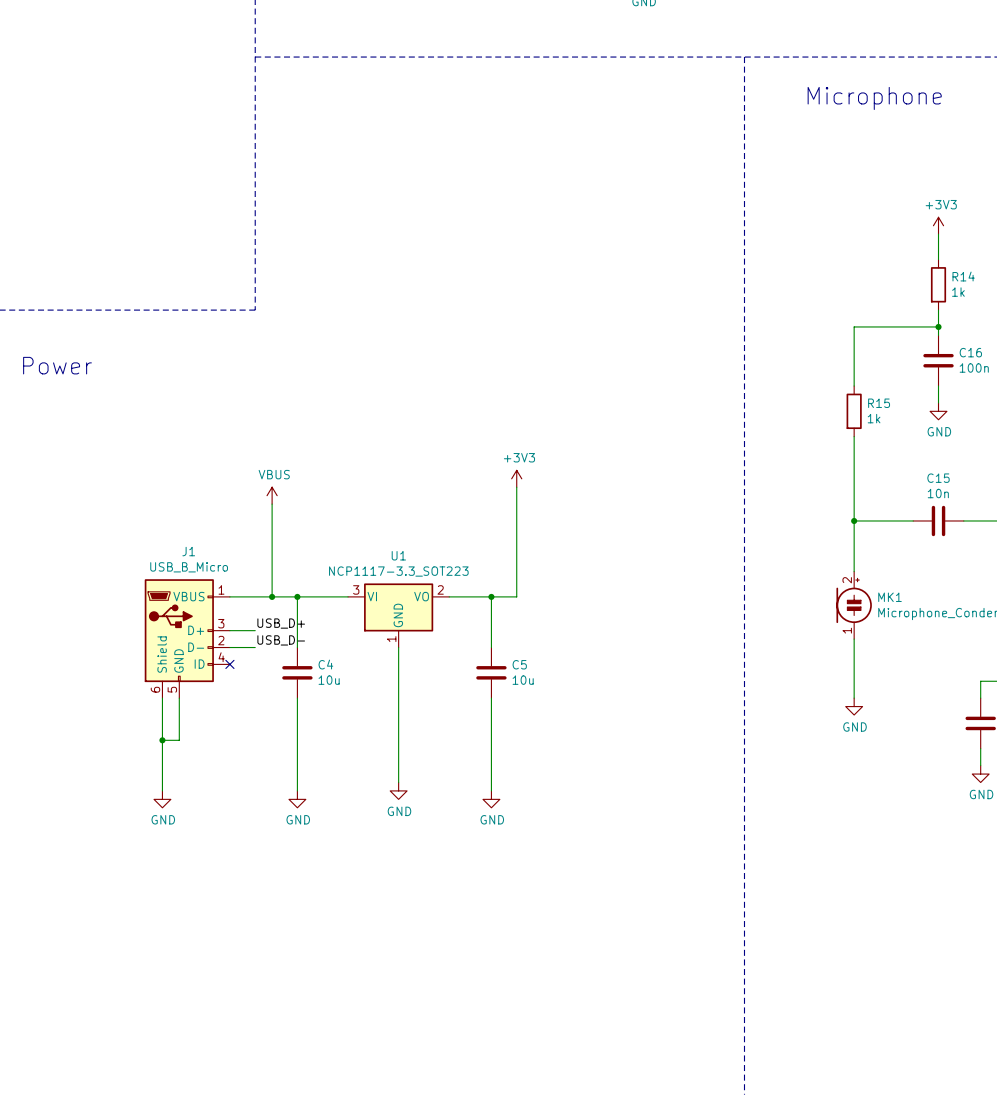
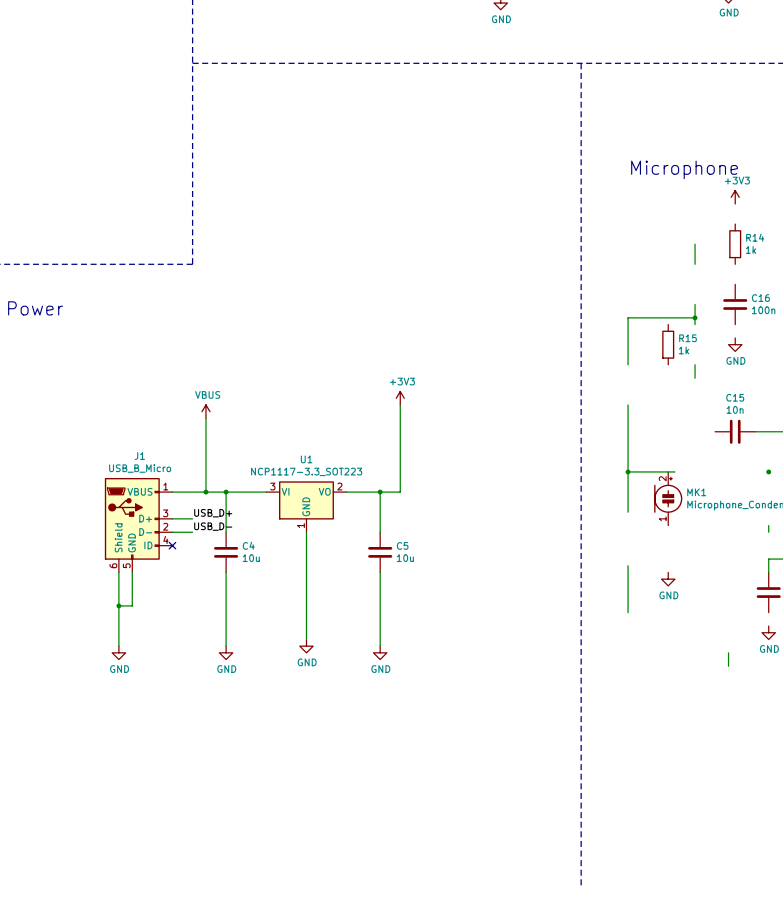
text position: Microphone (874, 98) -> Microphone (684, 169)
wire: (938, 234) (938, 259) -> (695, 244) (695, 264)
wire: (938, 310) (938, 335) -> (695, 304) (695, 324)
wire: (938, 326) (854, 326) (854, 386) -> (695, 317) (628, 317) (628, 364)
junction: (938, 326) -> none
junction: none -> (695, 317)
wire: (938, 386) (938, 402) -> (695, 364) (695, 378)
wire: (854, 436) (854, 571) -> (628, 404) (628, 512)
wire: (854, 520) (913, 520) -> (628, 471) (674, 471)
junction: (854, 520) -> none
junction: none -> (628, 471)
junction: none -> (768, 471)
wire: (854, 639) (854, 698) -> (628, 565) (628, 612)
wire: none -> (768, 525) (768, 532)
wire: (980, 748) (980, 765) -> (728, 652) (728, 666)

